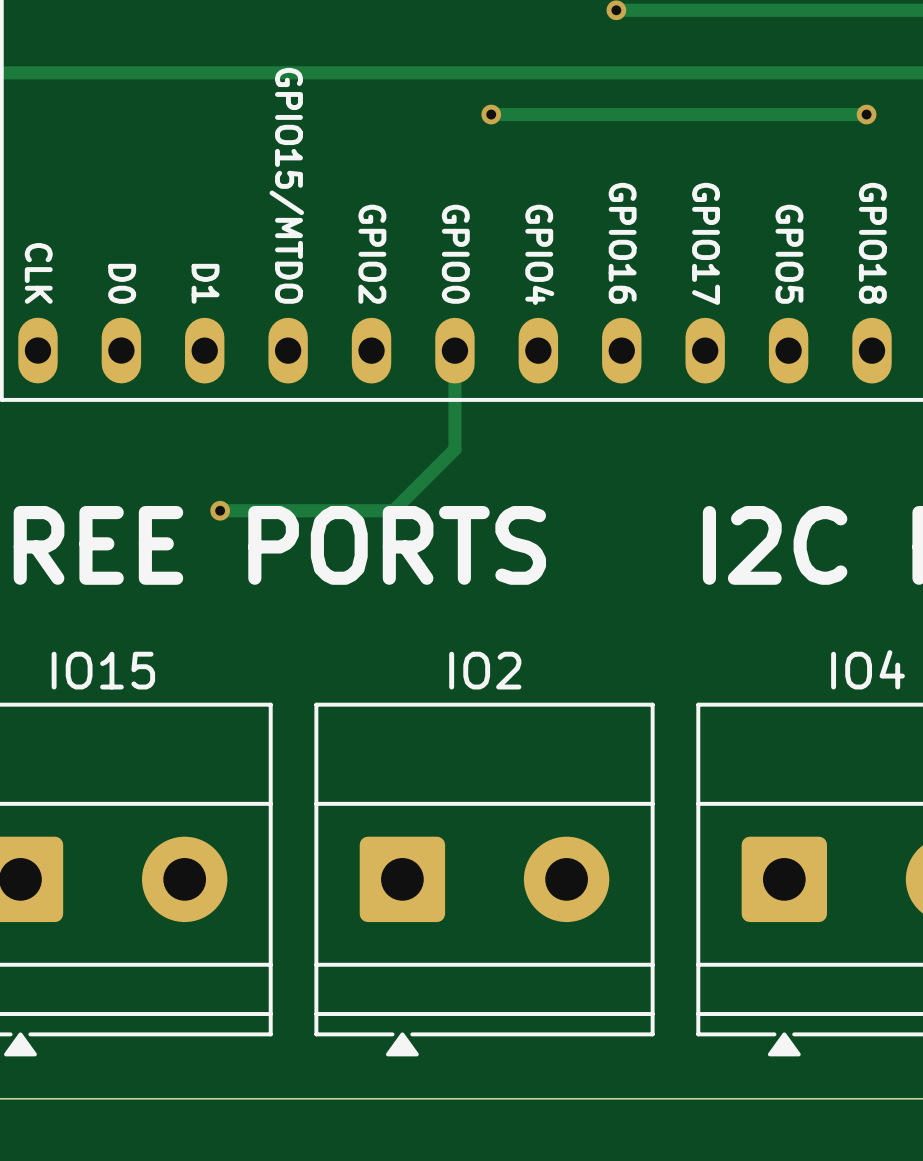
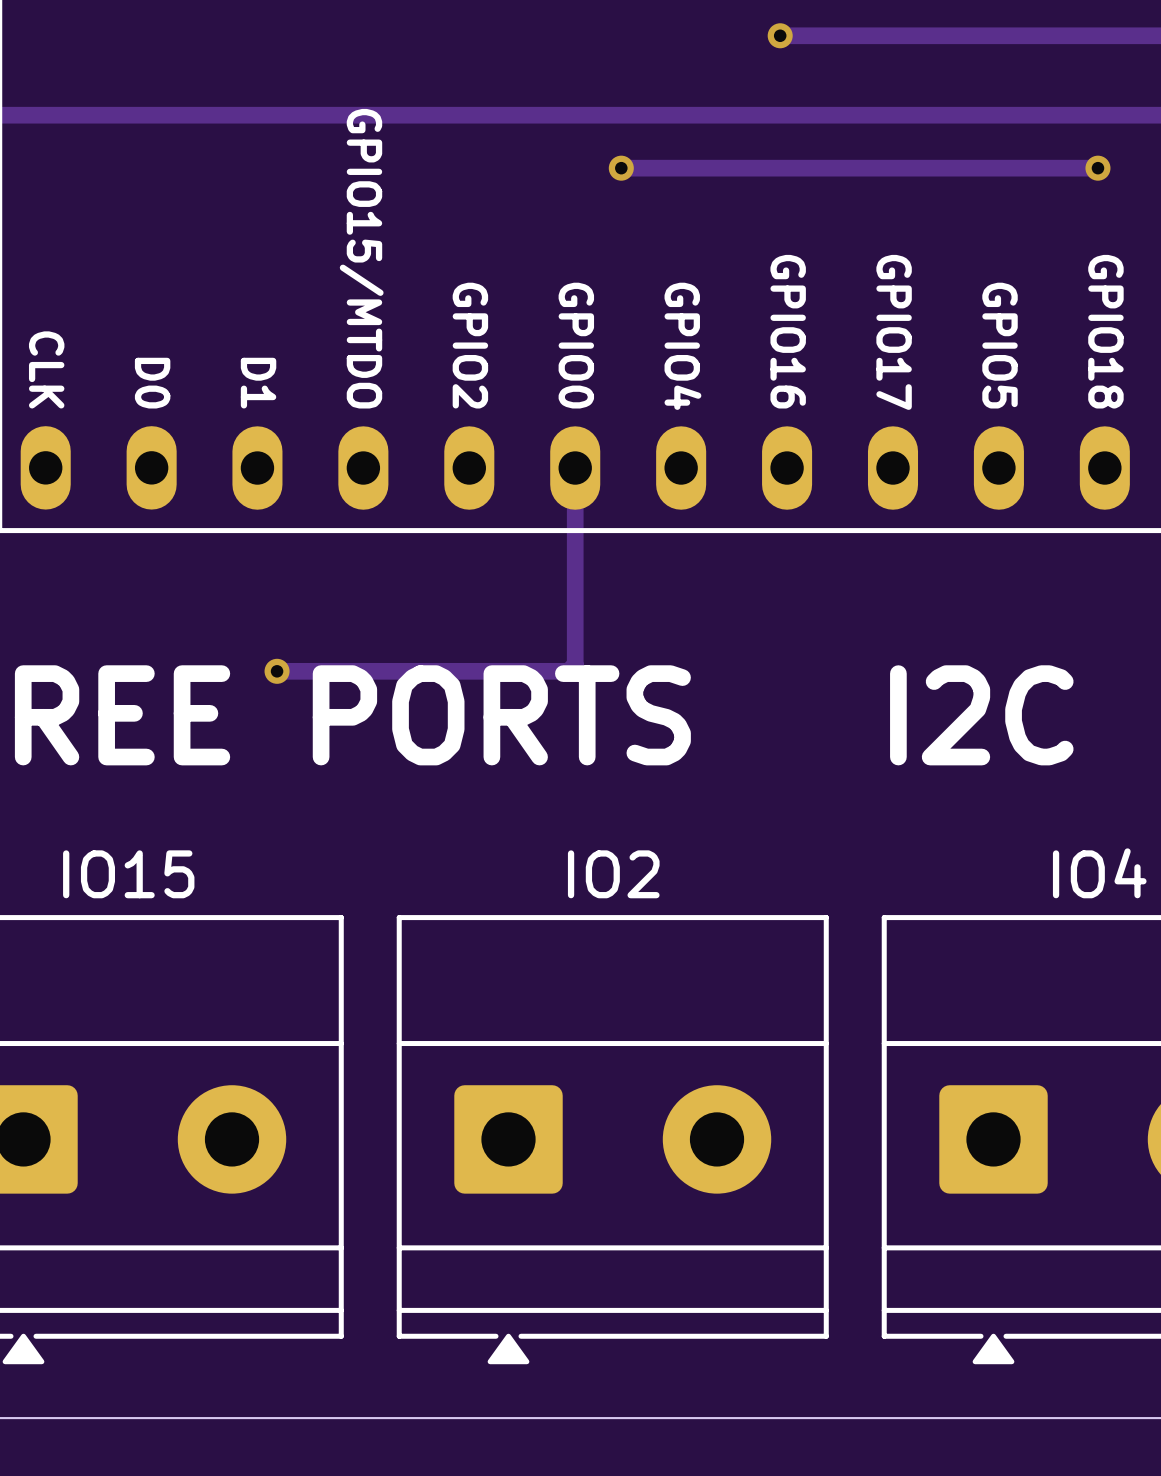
track: (454, 449) (393, 510) -> (575, 593) (575, 664) (568, 671) (497, 671)

